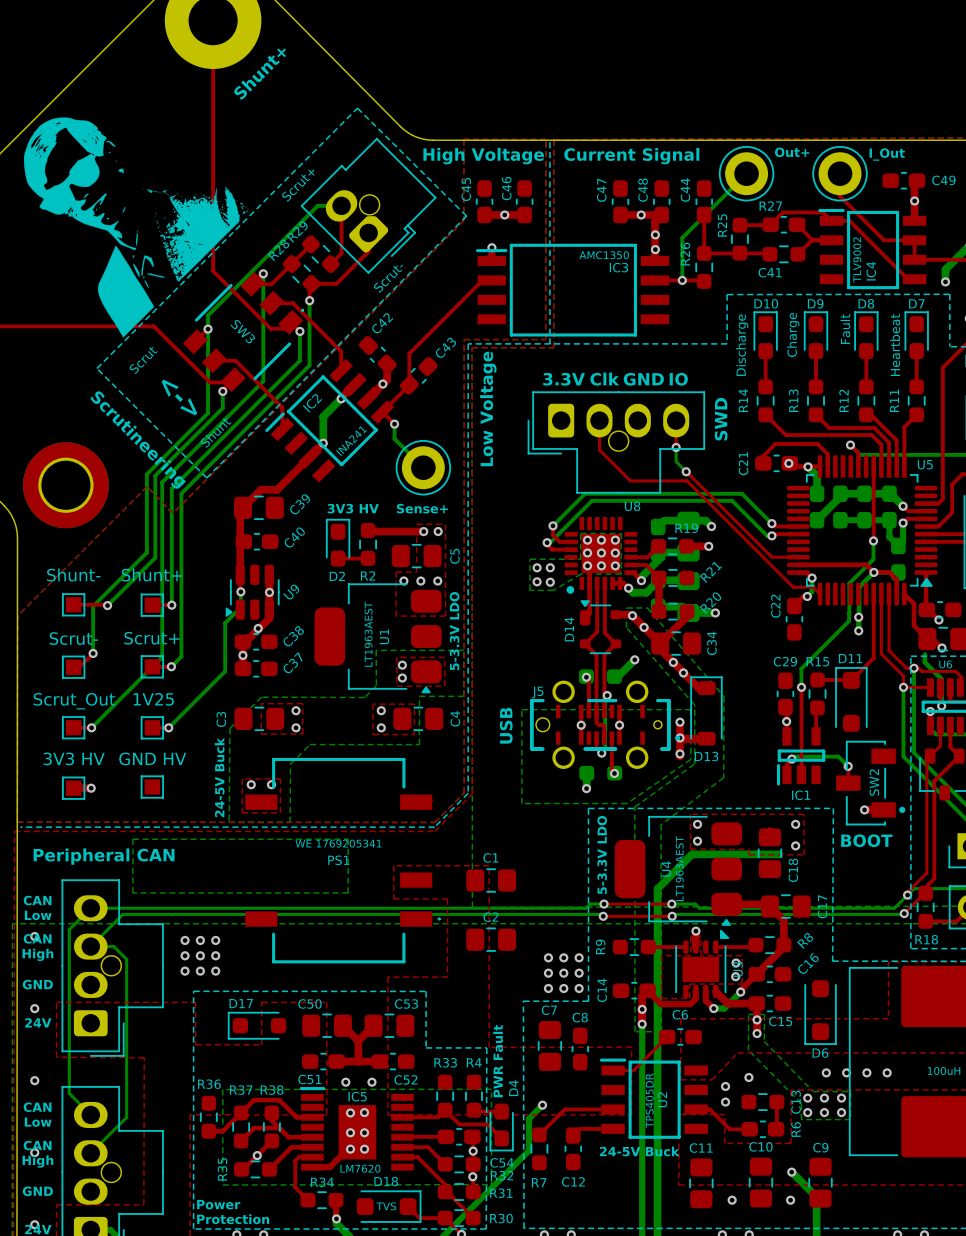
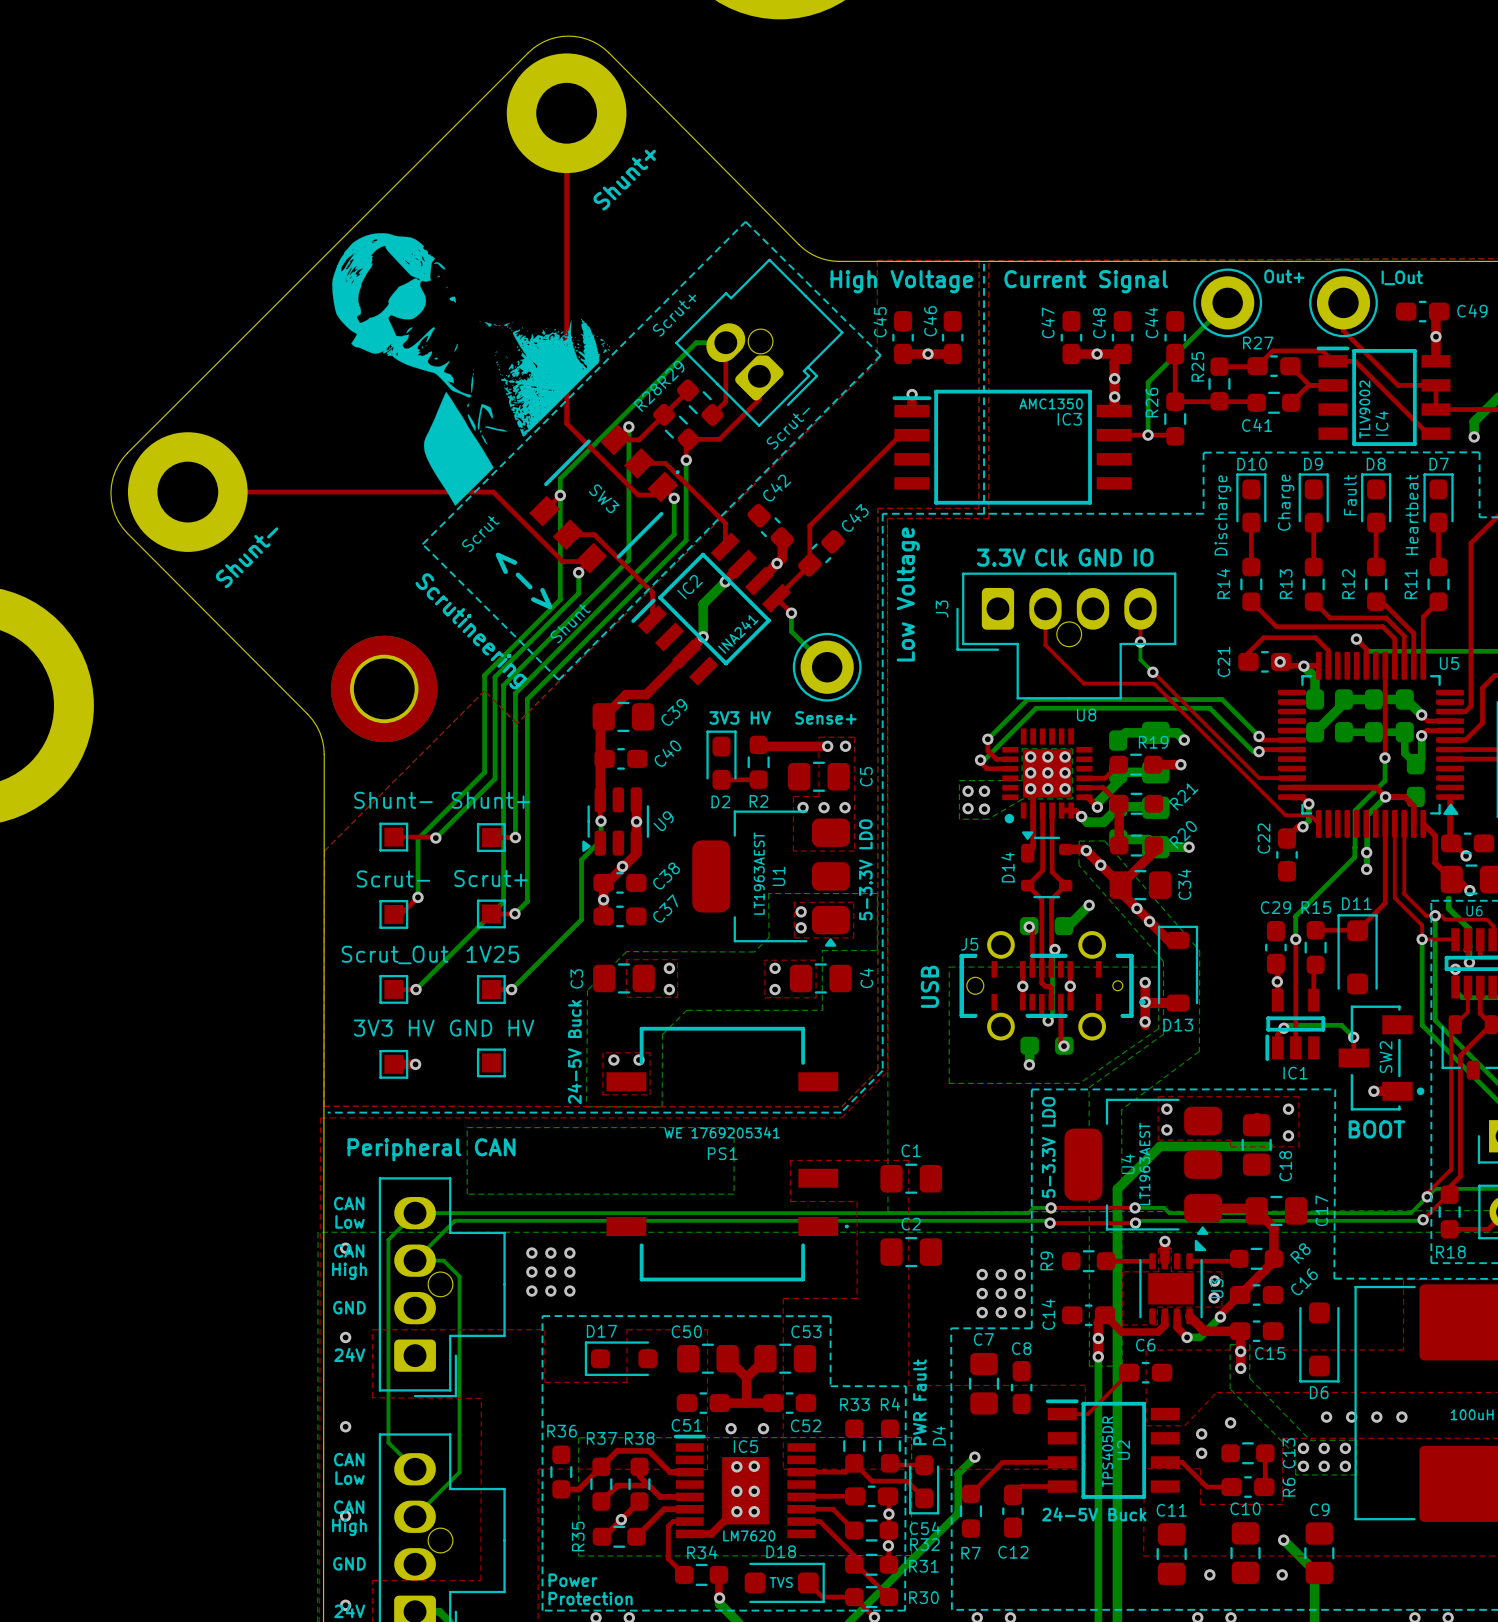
text: SWD (721, 419) -> none
J3 name: none -> J3 (942, 609)

